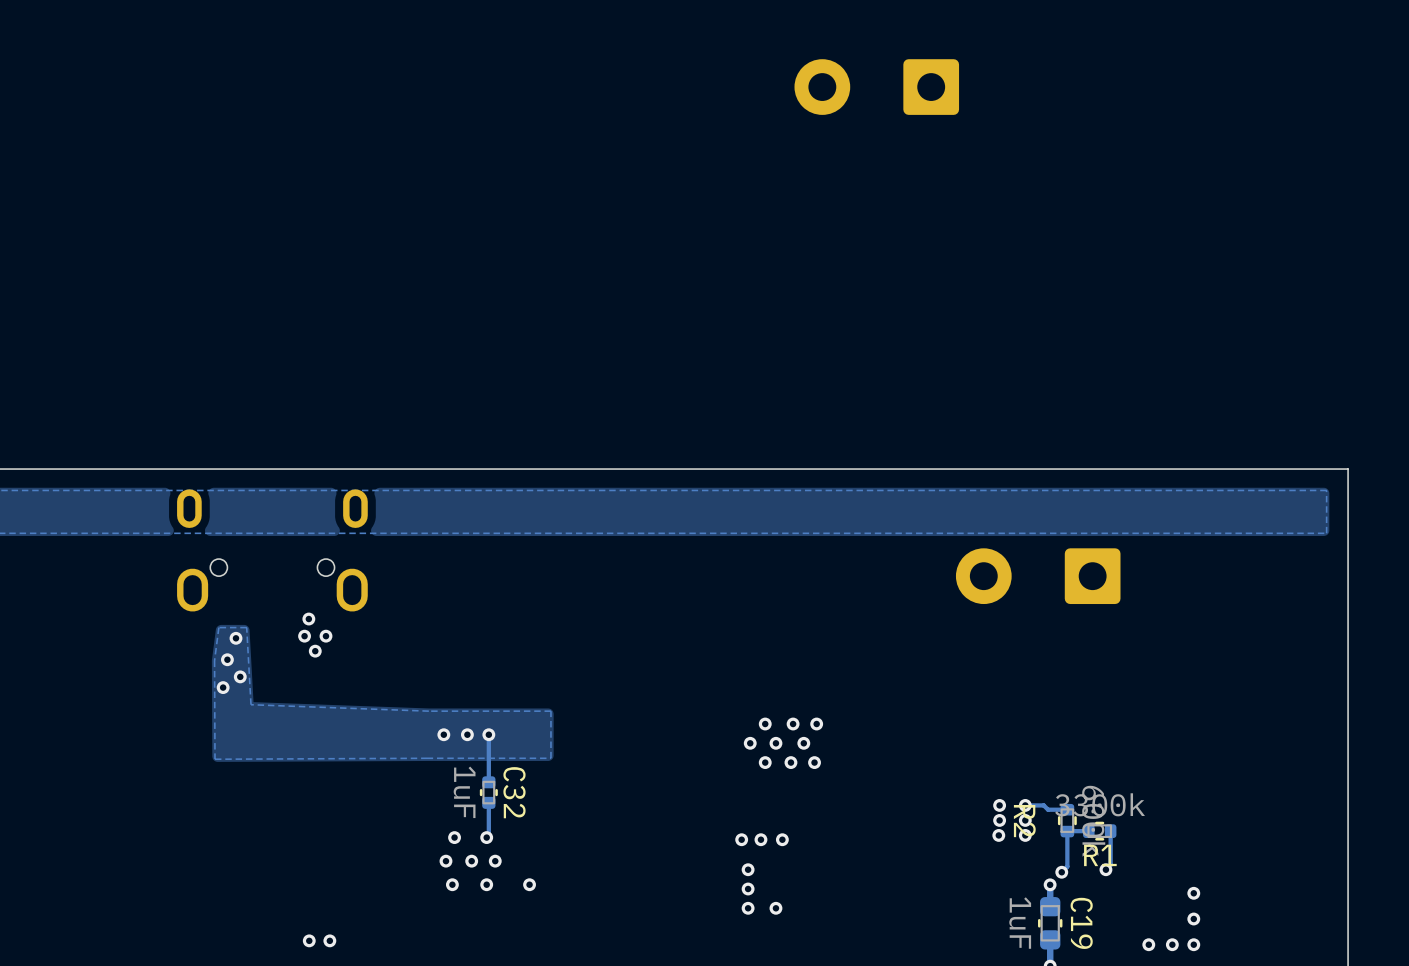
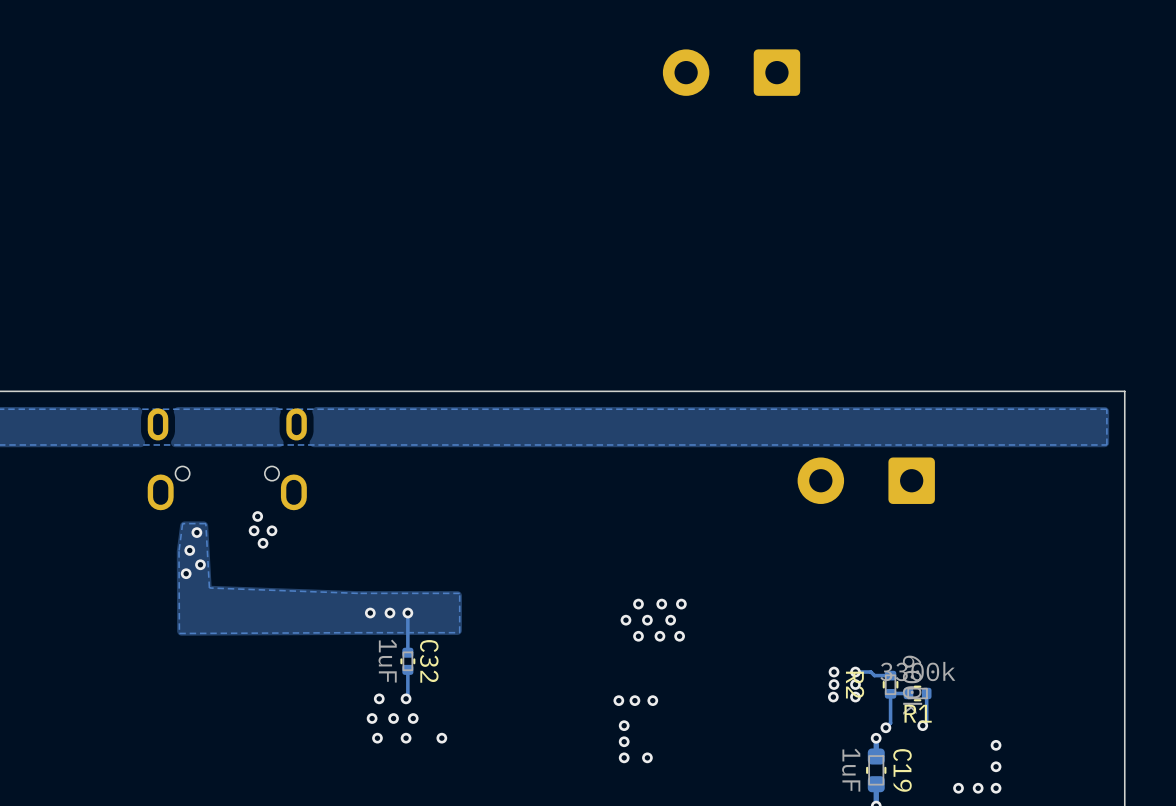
via: (309, 940) -> none
via: (329, 940) -> none

